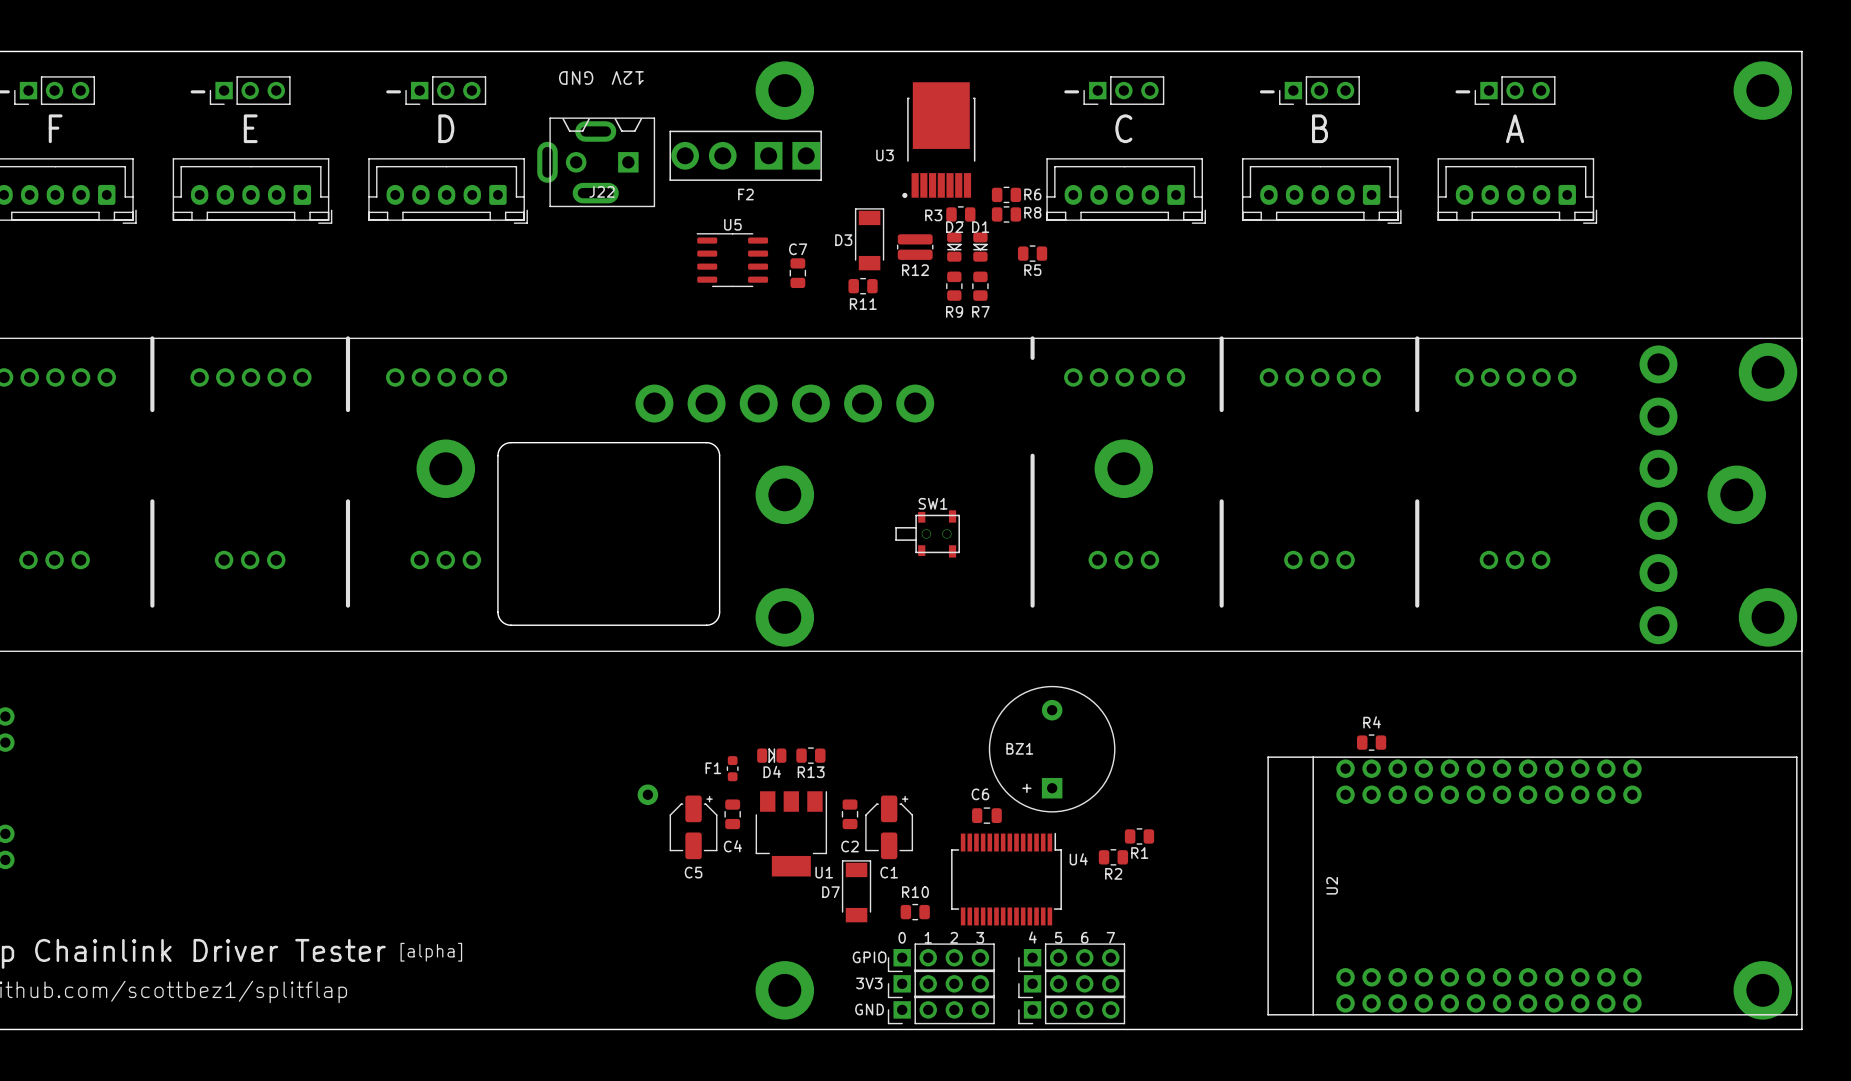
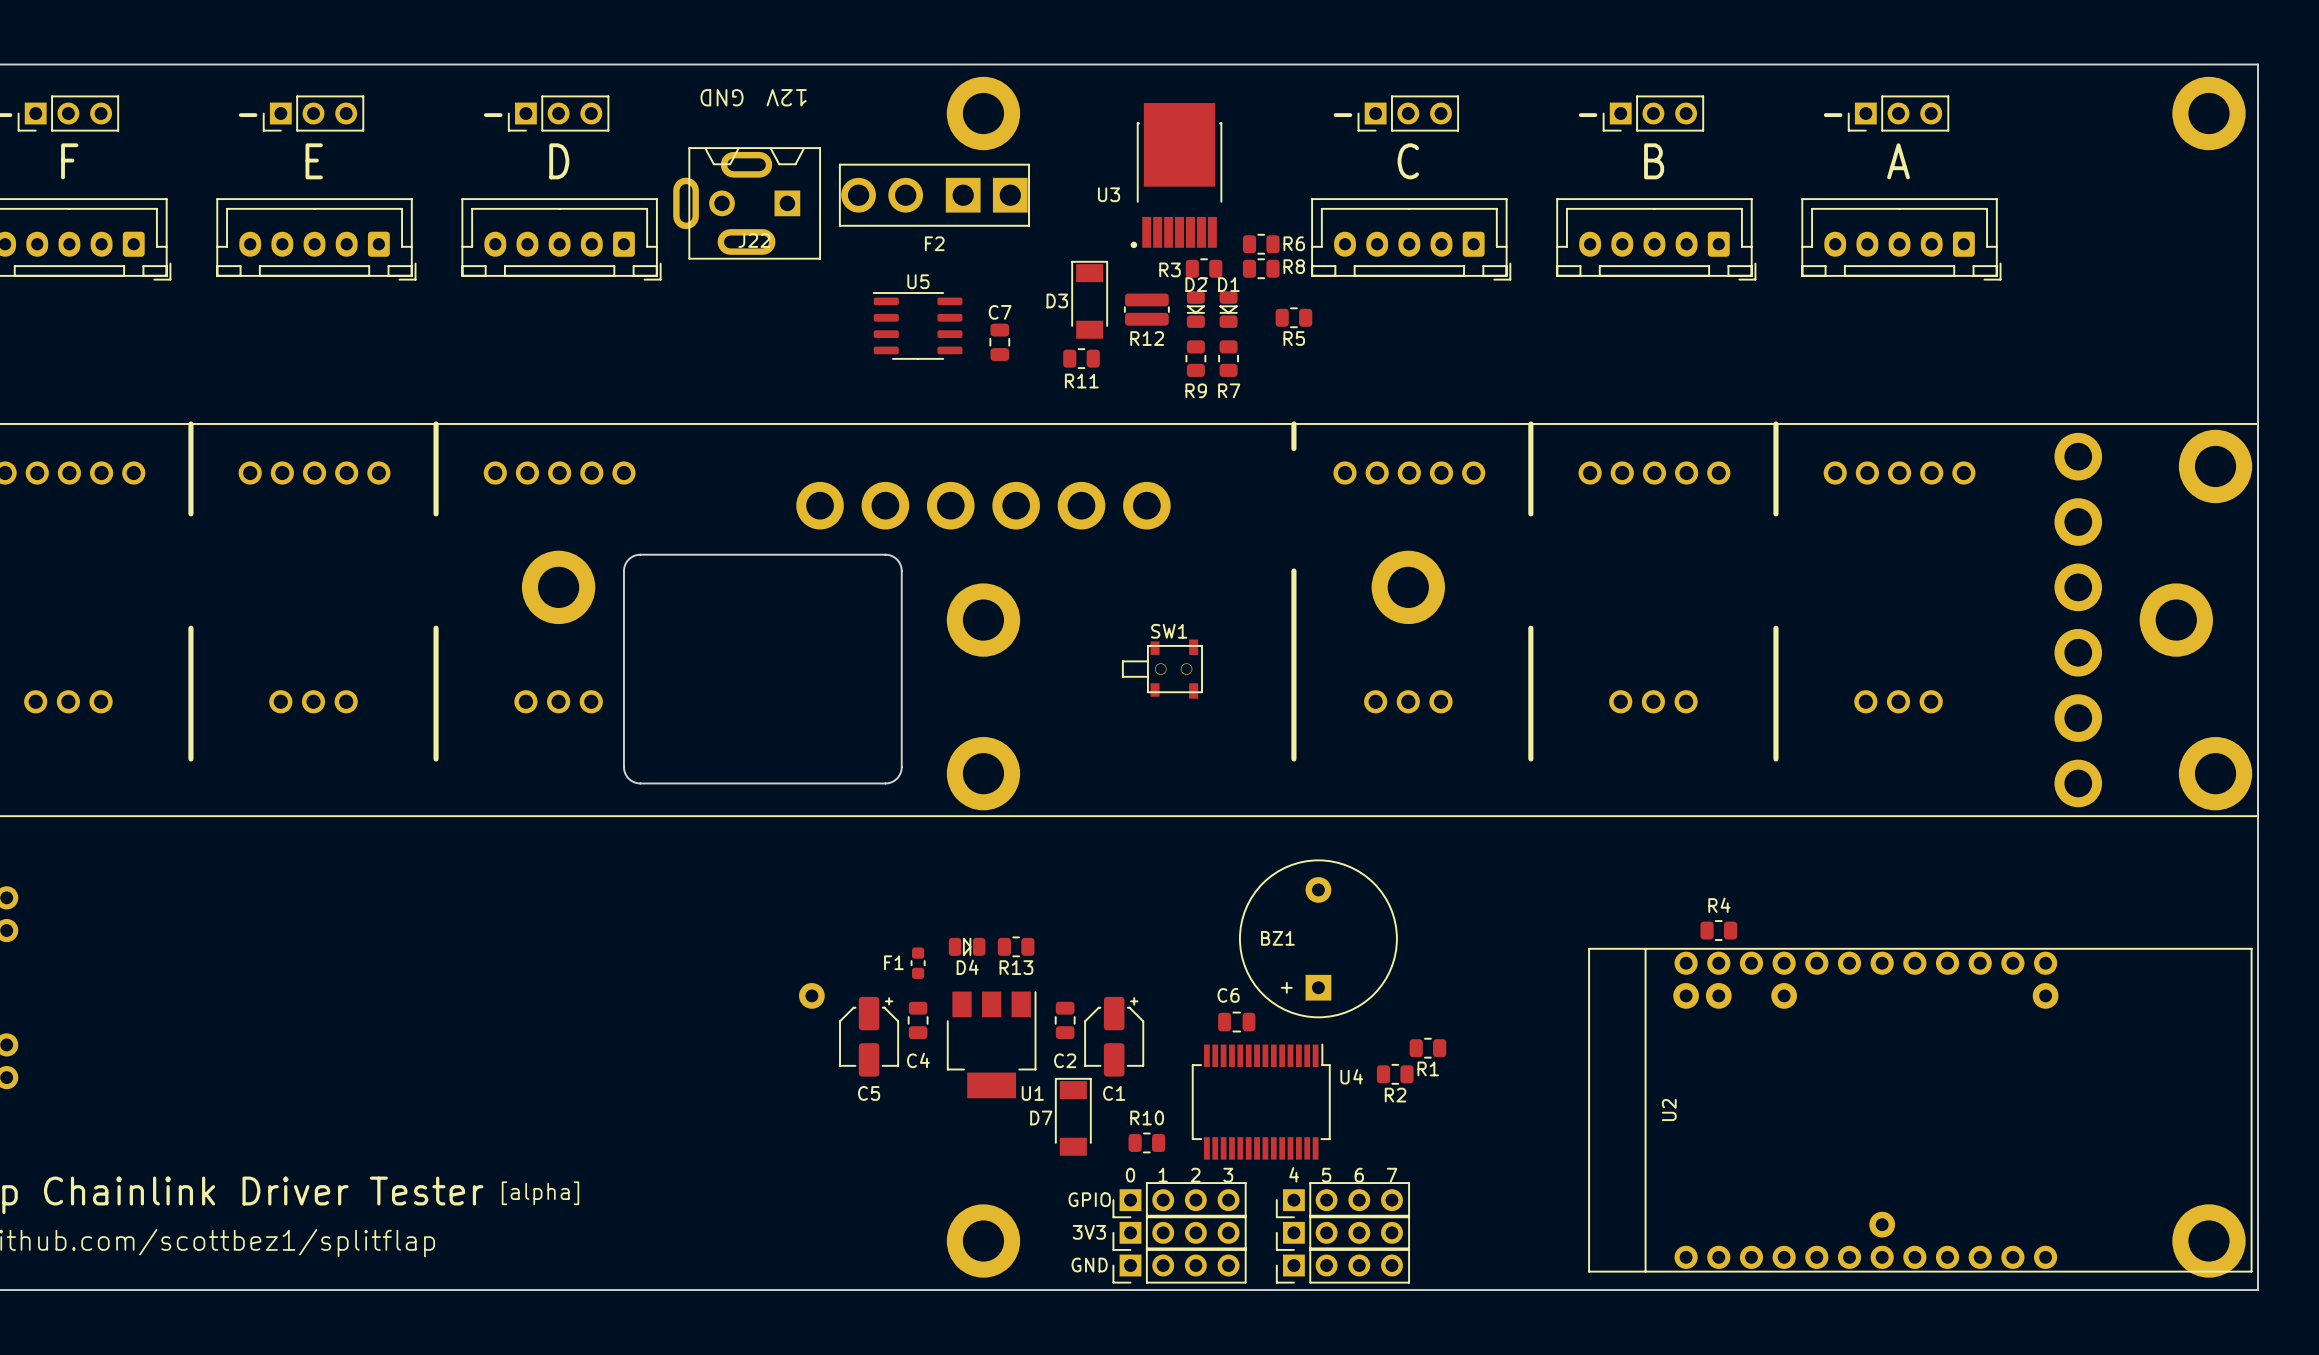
U2 footprint: [1267, 756, 1798, 1016] -> [1588, 947, 2253, 1273]
part: none -> (1686, 995)
part: none -> (1718, 995)
part: none -> (1784, 995)
part: none -> (2045, 995)
part: none -> (1882, 1224)

